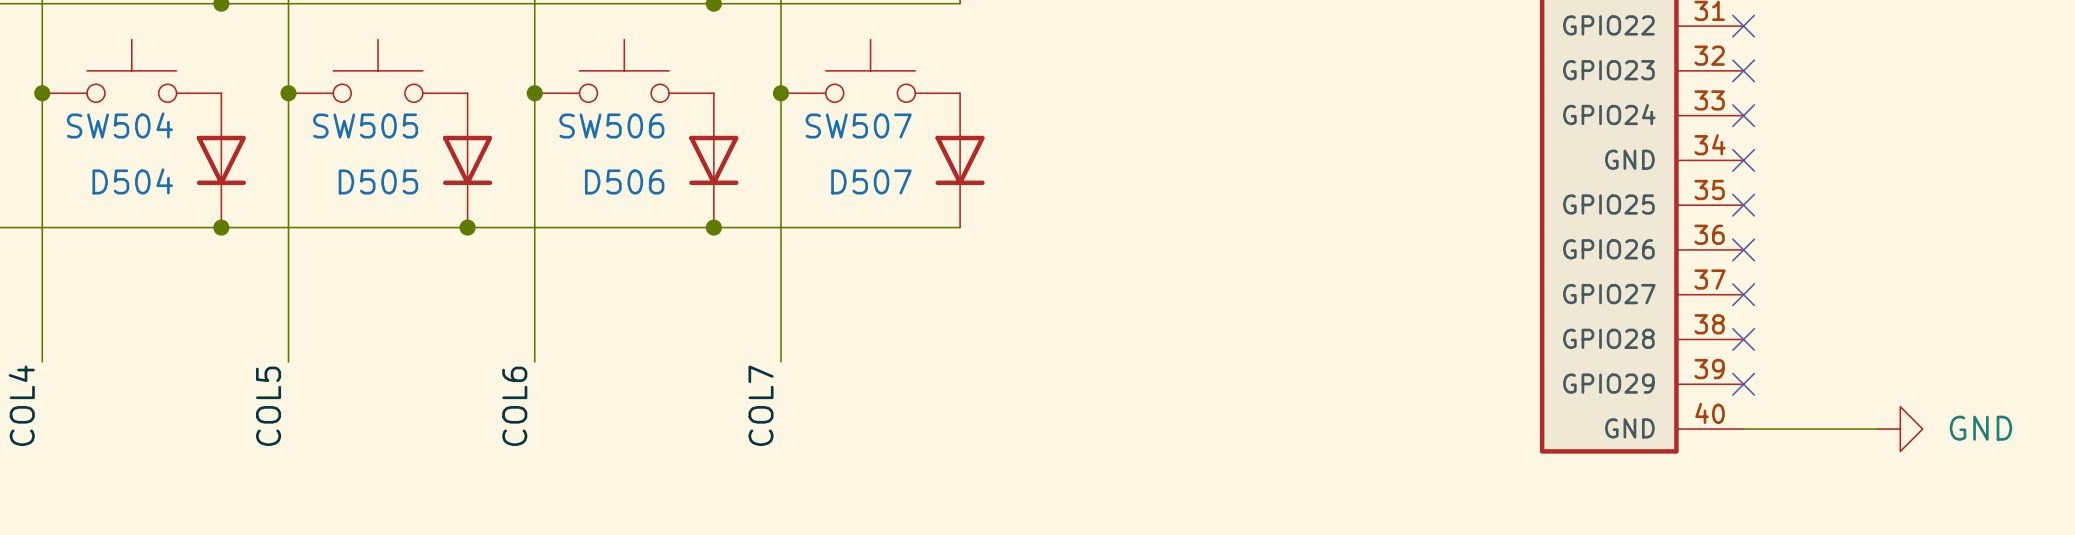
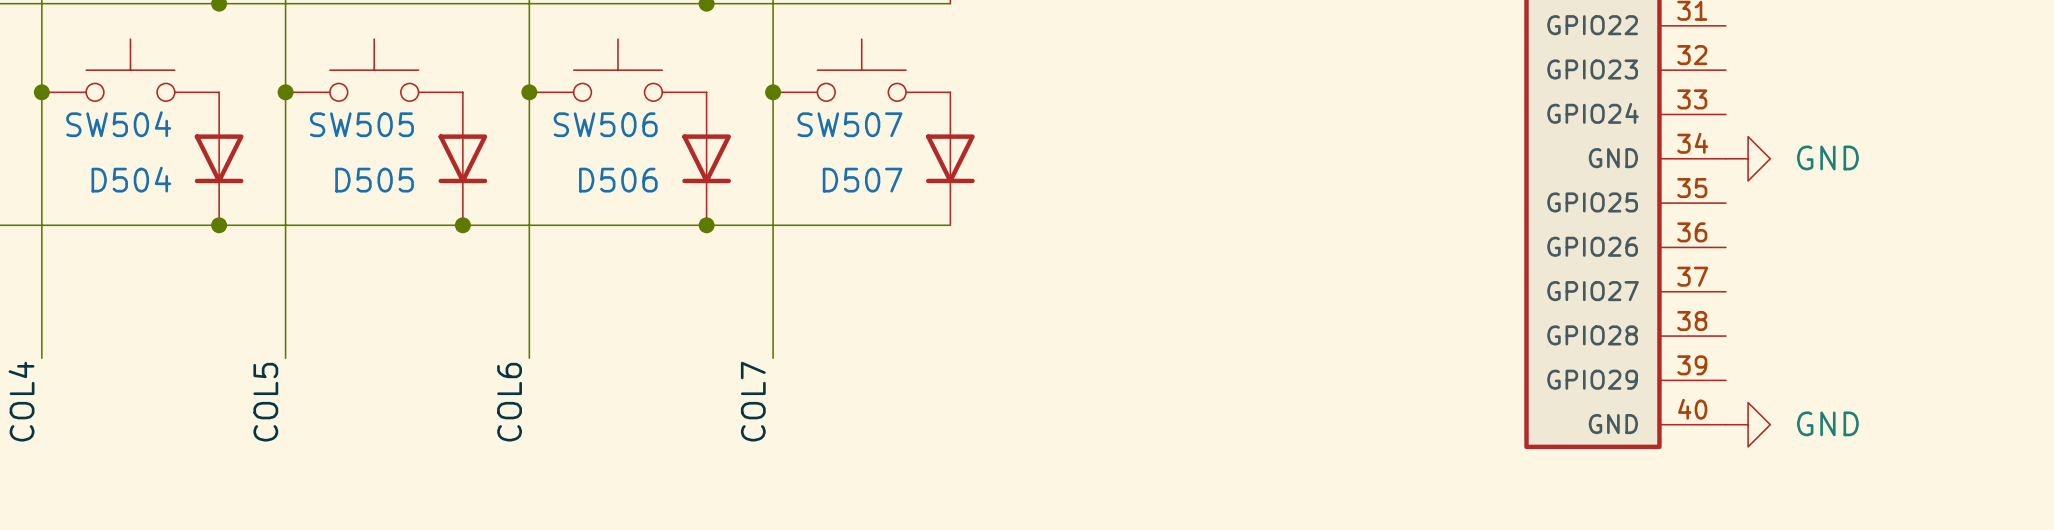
no-connect mark: (1743, 26) -> none
no-connect mark: (1743, 70) -> none
no-connect mark: (1743, 115) -> none
no-connect mark: (1743, 160) -> none
power symbol: none -> GND (1748, 158)
no-connect mark: (1743, 205) -> none
no-connect mark: (1743, 249) -> none
no-connect mark: (1743, 294) -> none
no-connect mark: (1743, 339) -> none
no-connect mark: (1743, 384) -> none
wire: (1743, 429) (1877, 429) -> none
power symbol position: GND (1900, 429) -> GND (1748, 424)

